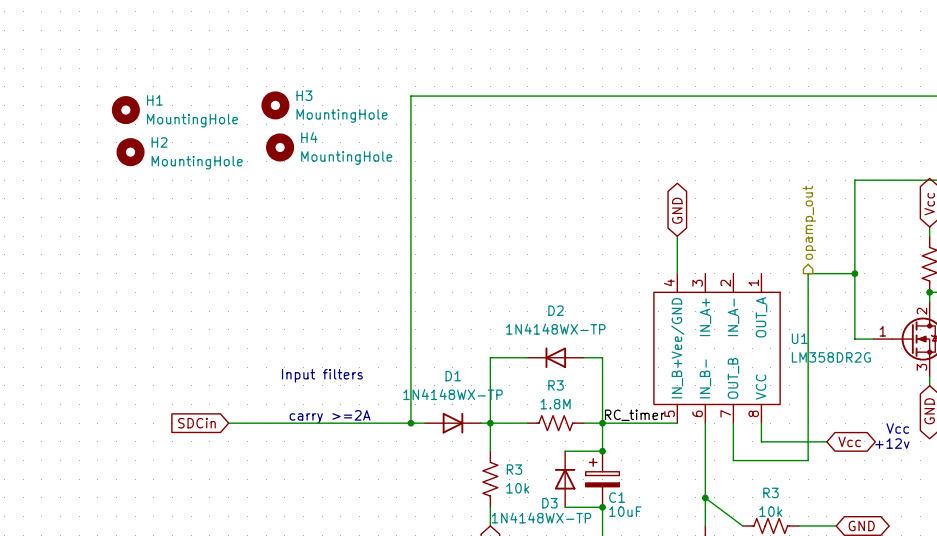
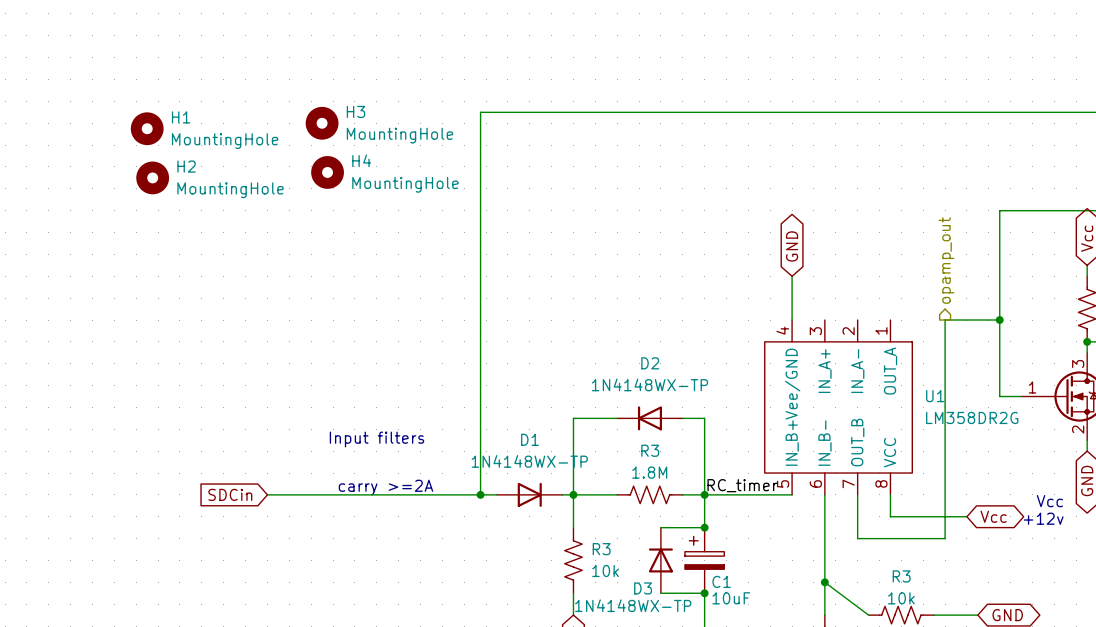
part pin number: 2 (921, 311) -> 3 (1078, 363)
part pin number: 3 (921, 367) -> 2 (1078, 429)

